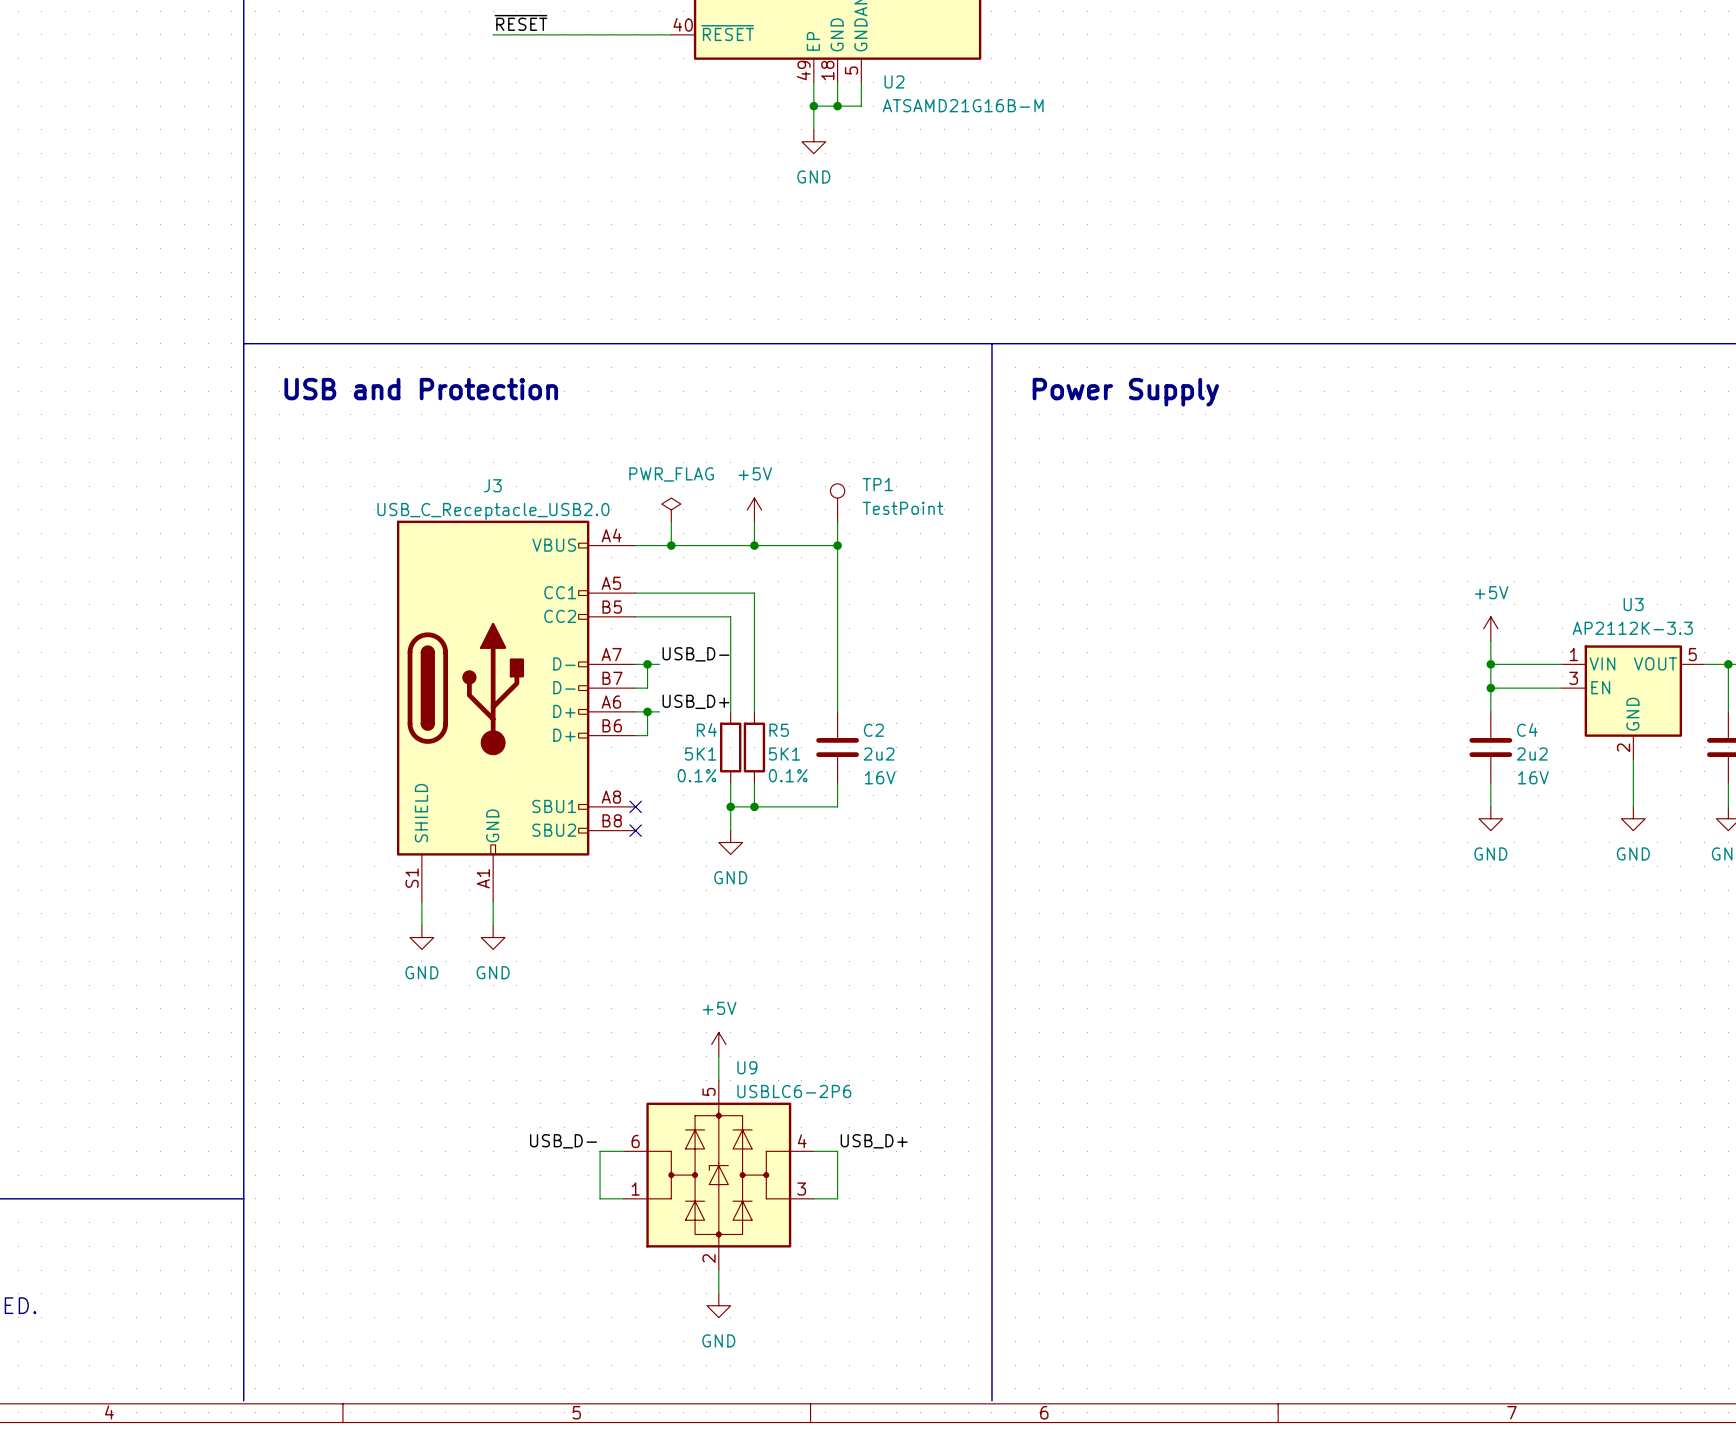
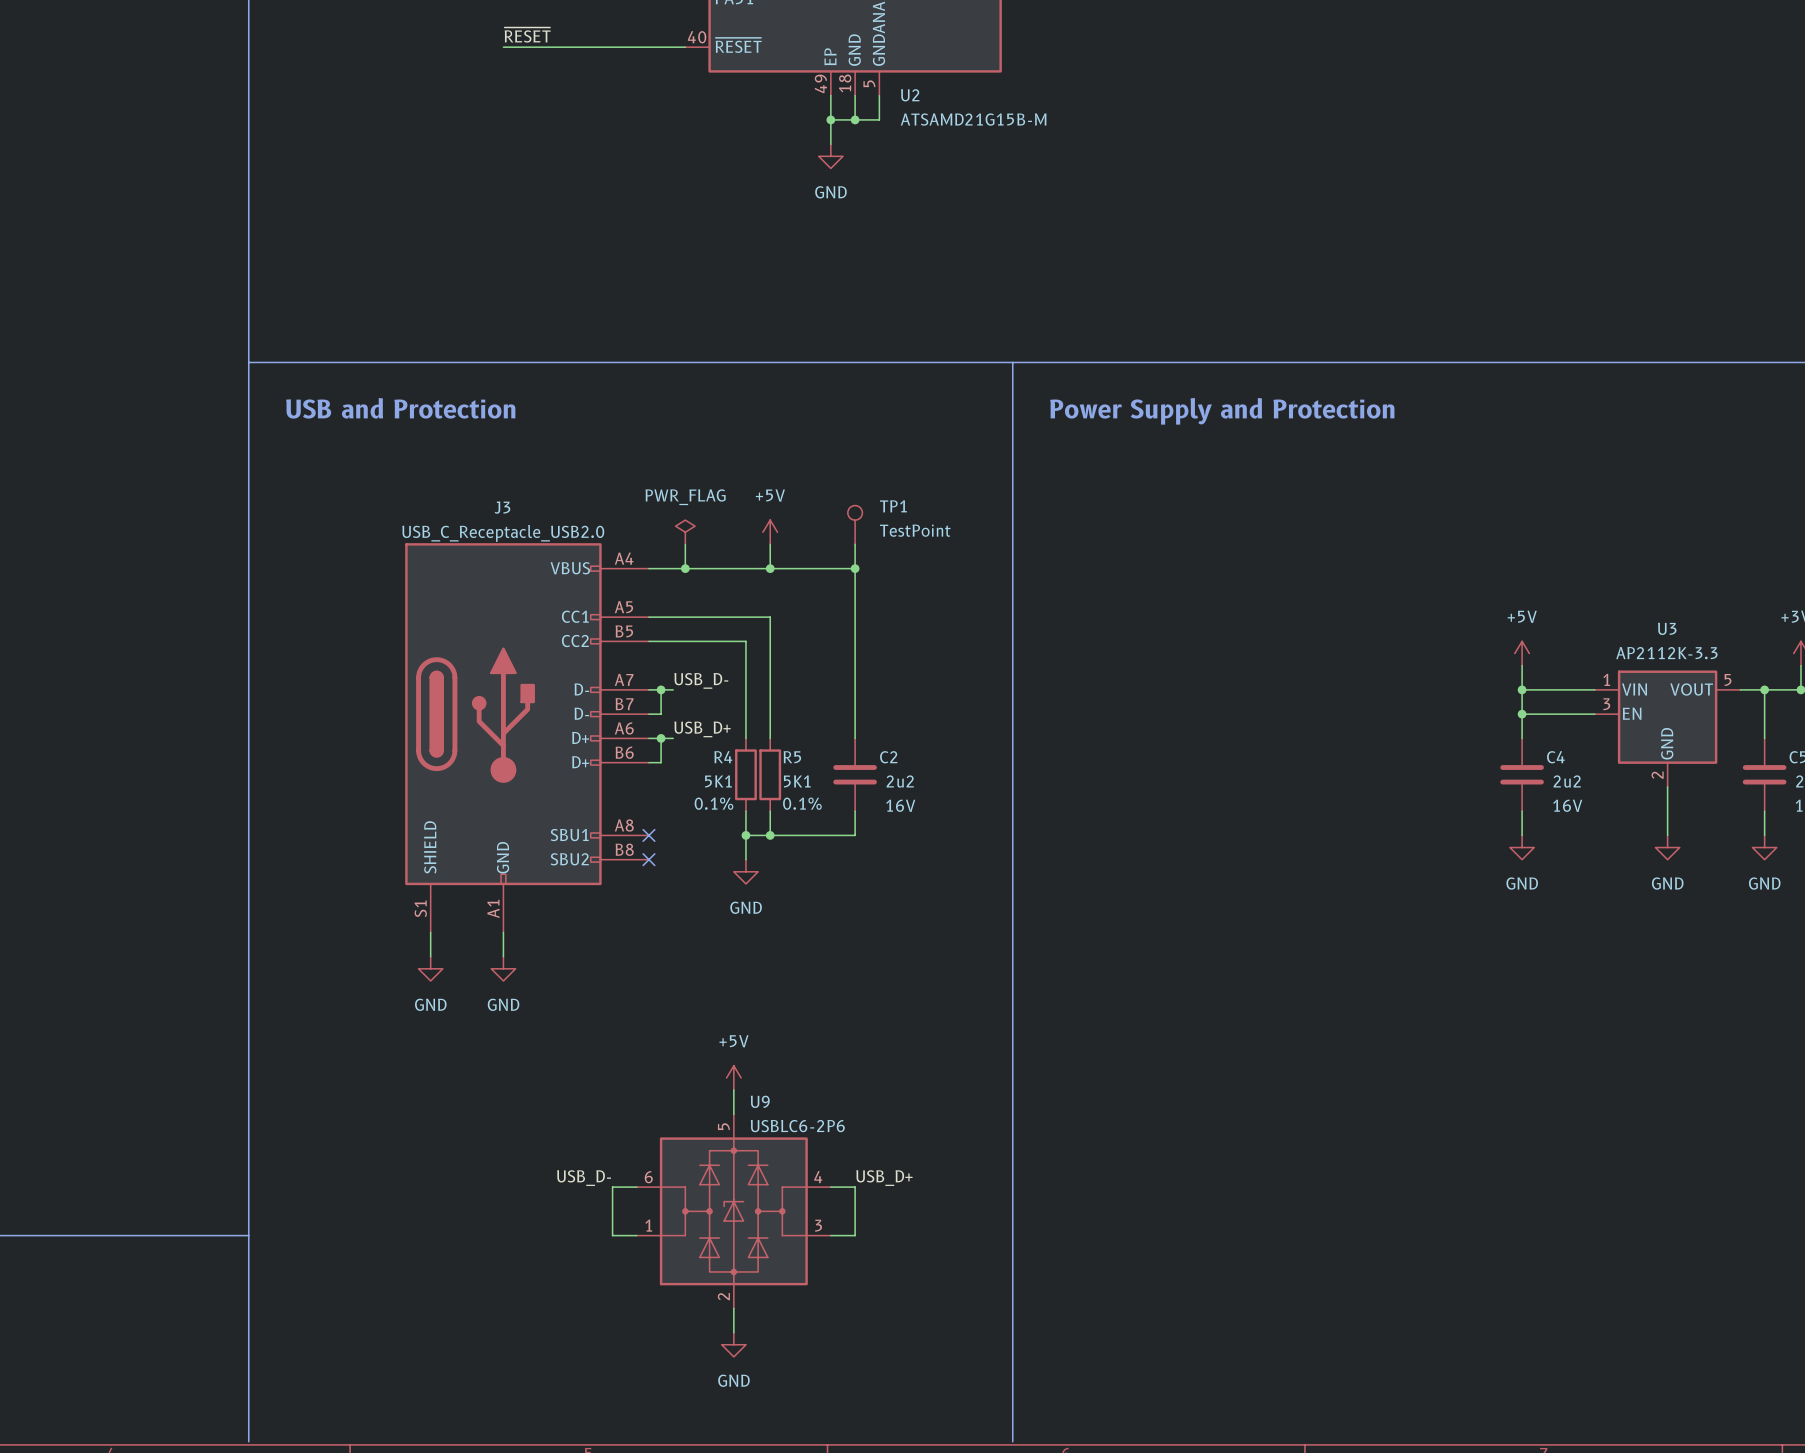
U2 value: ATSAMD21G16B-M (963, 105) -> ATSAMD21G15B-M (973, 119)
text: Power Supply (1125, 392) -> Power Supply and Protection (1222, 411)

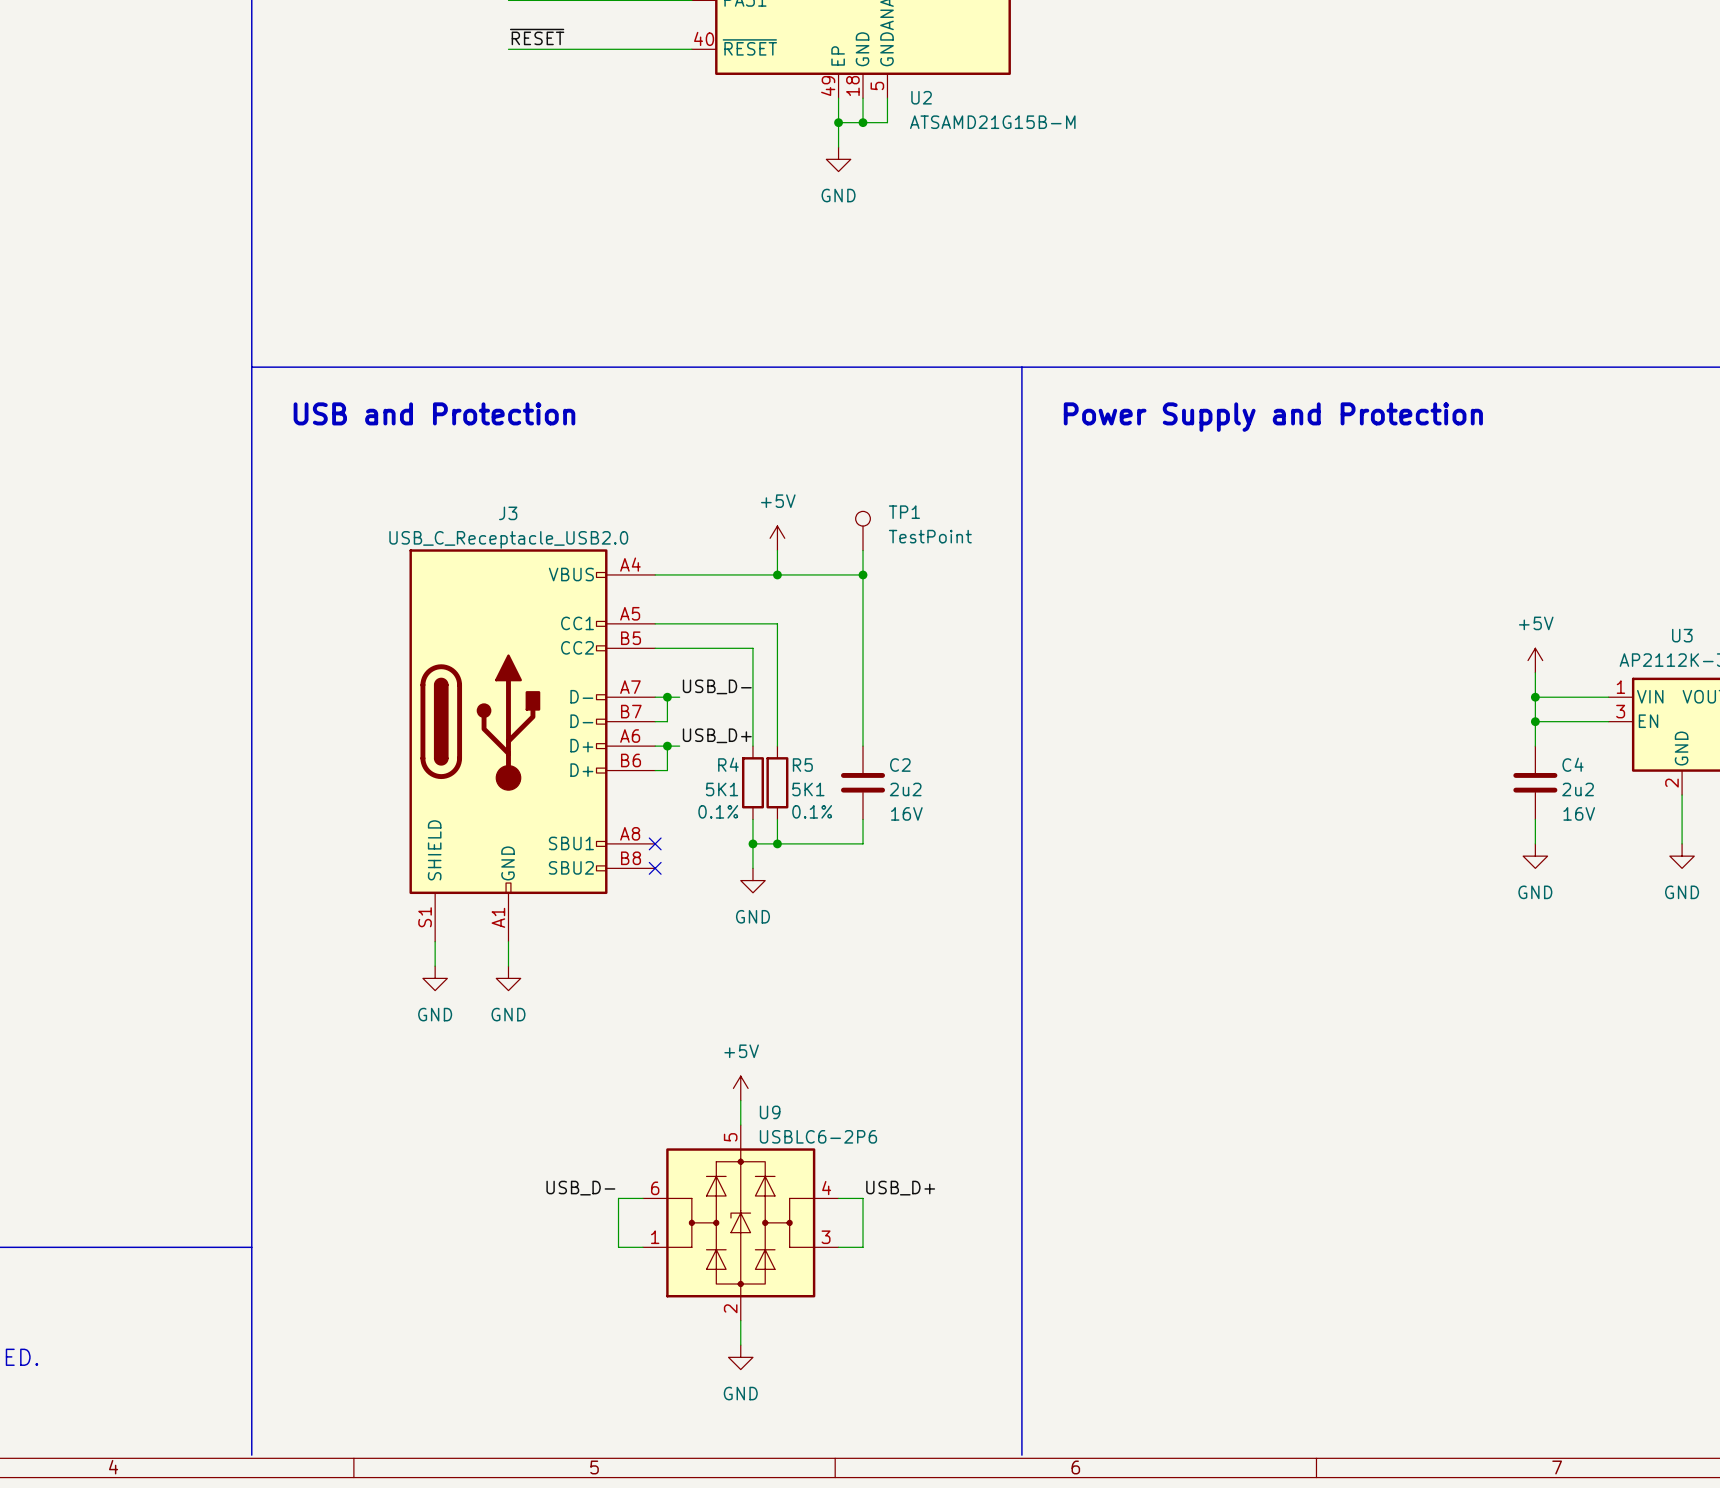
power symbol: PWR_FLAG (685, 532) -> none
wire: (685, 544) (685, 568) -> none
junction: (685, 568) -> none

